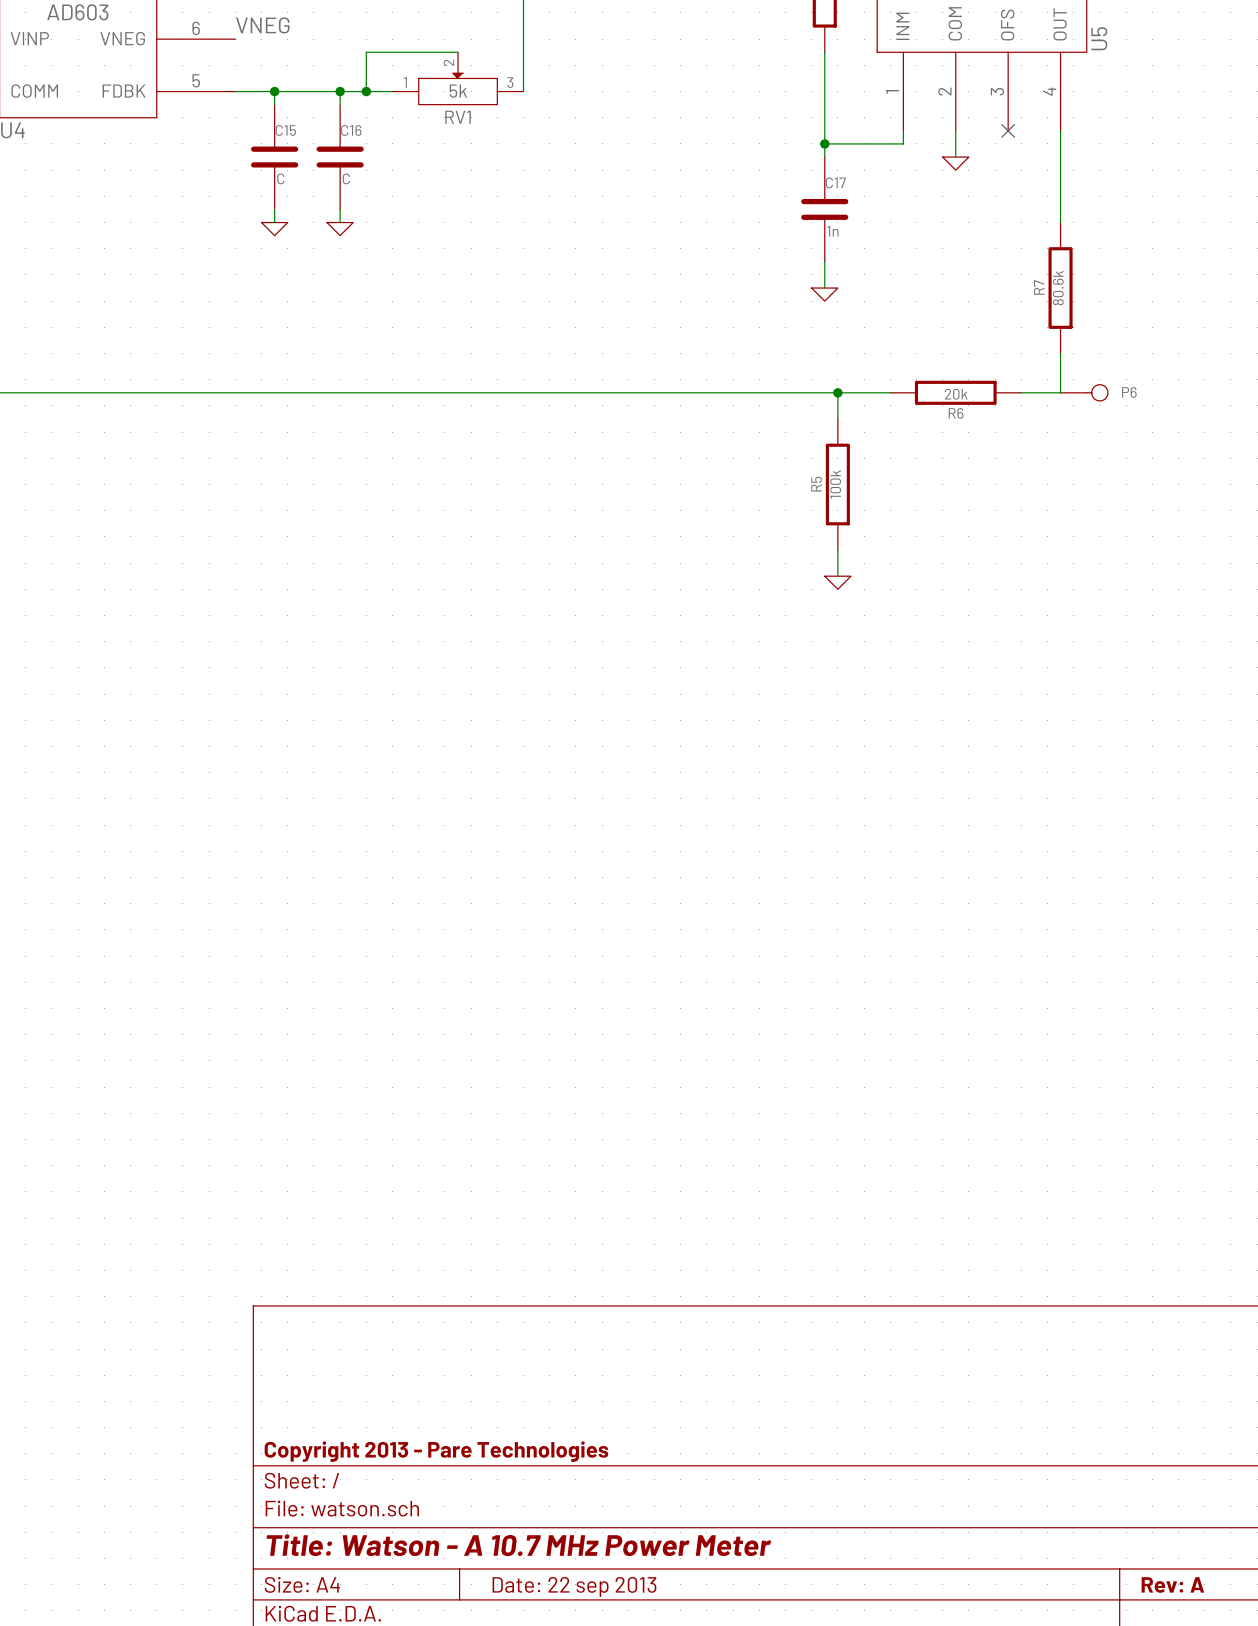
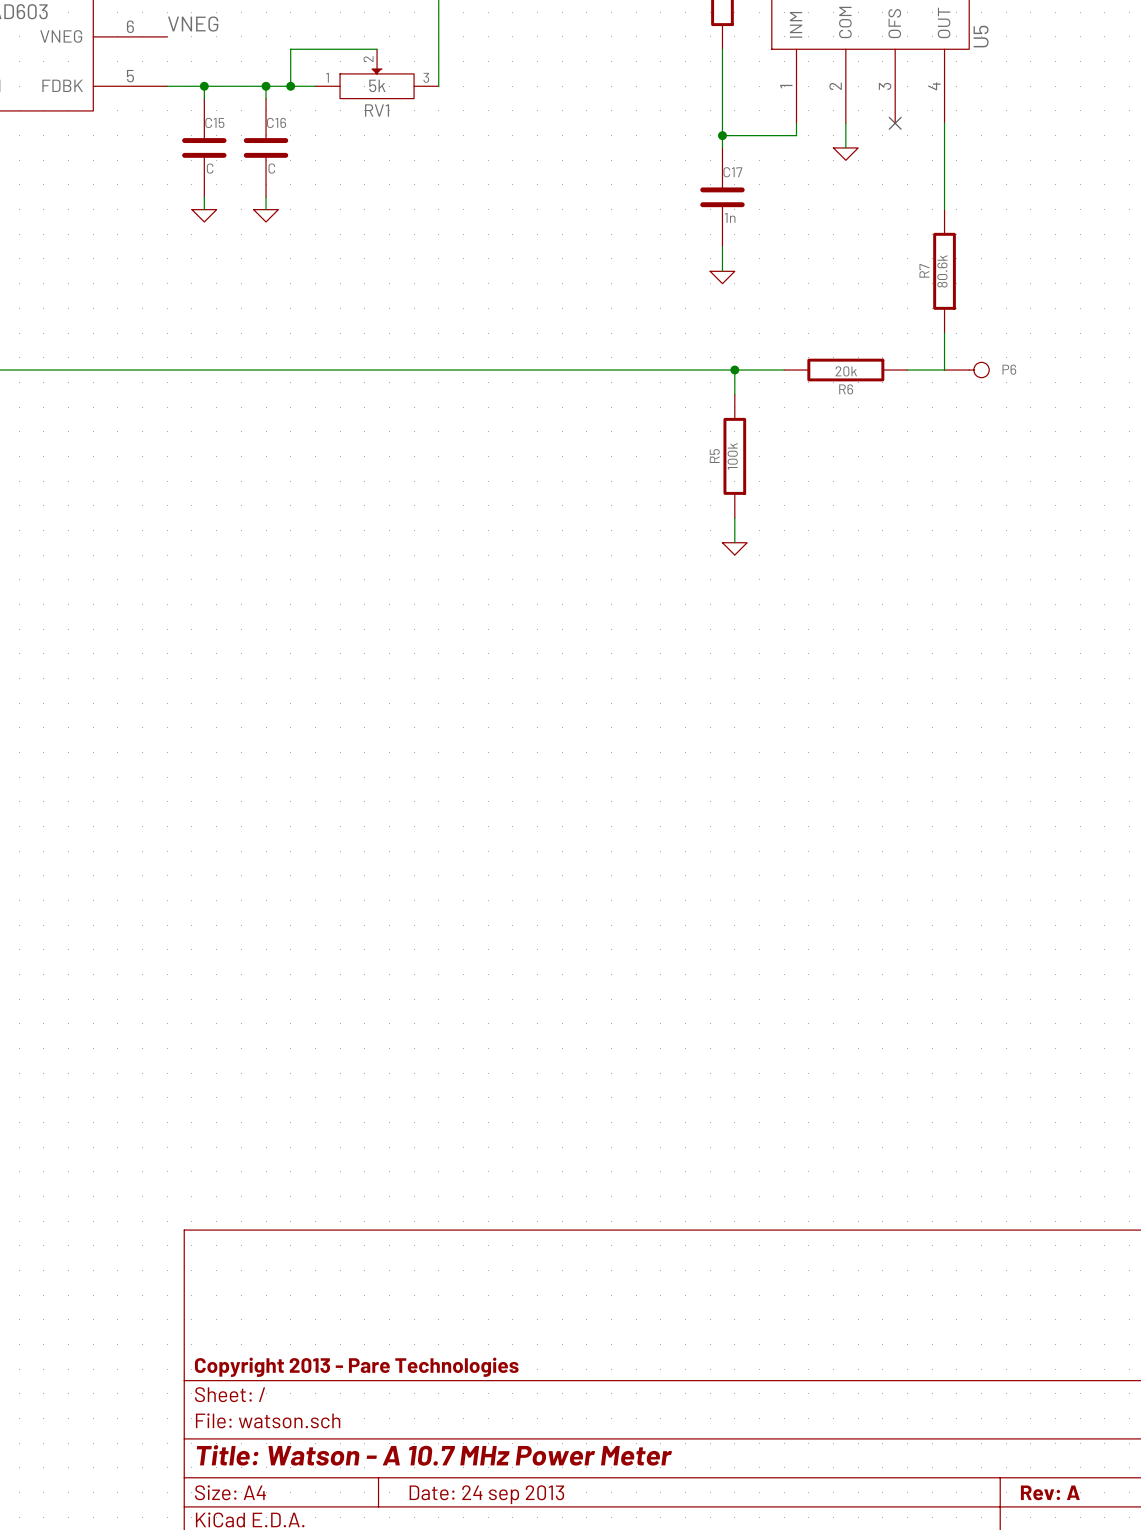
title block: Date: 22 sep 2013 (574, 1586) -> Date: 24 sep 2013 (486, 1494)

